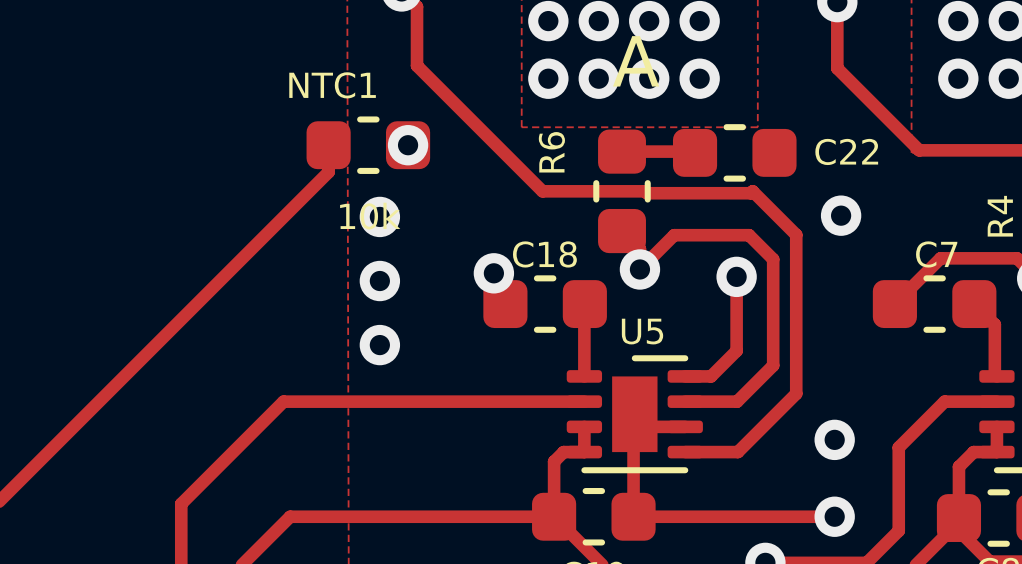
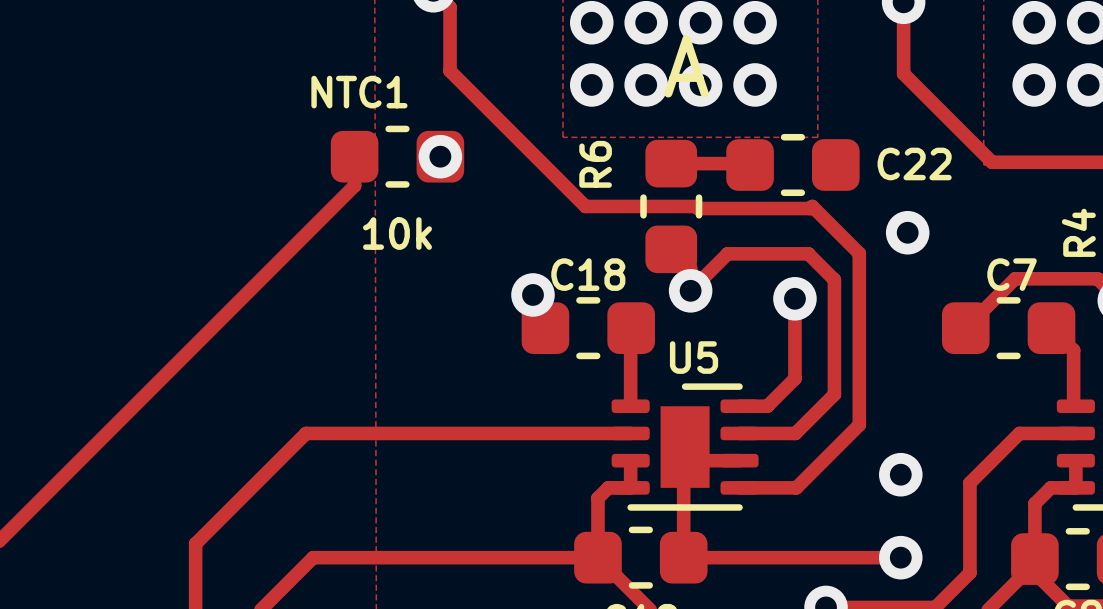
via: (379, 216) -> none
via: (379, 281) -> none
via: (379, 345) -> none

